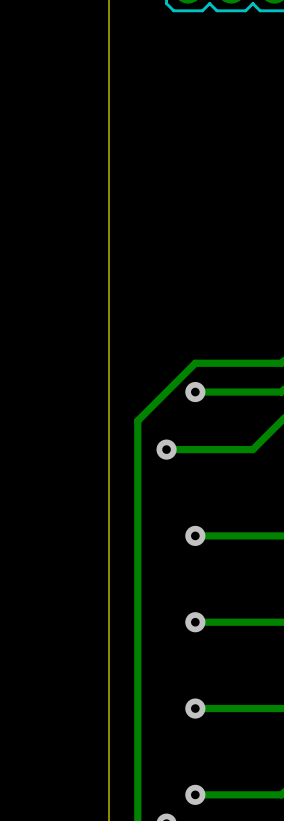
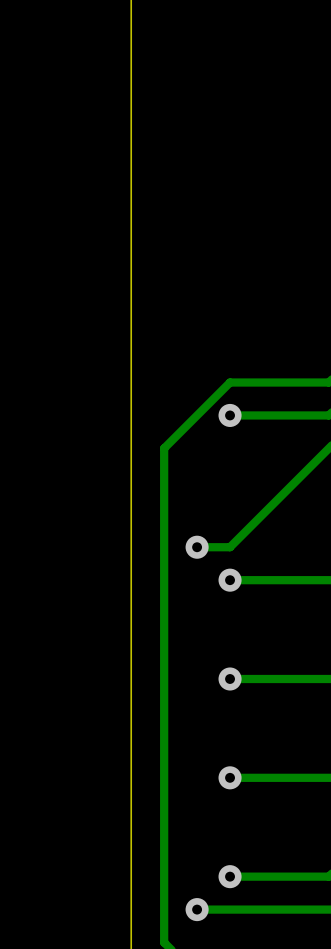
via position: (166, 449) -> (197, 547)
track: (252, 449) (166, 449) -> (295, 481) (230, 547) (197, 547)

